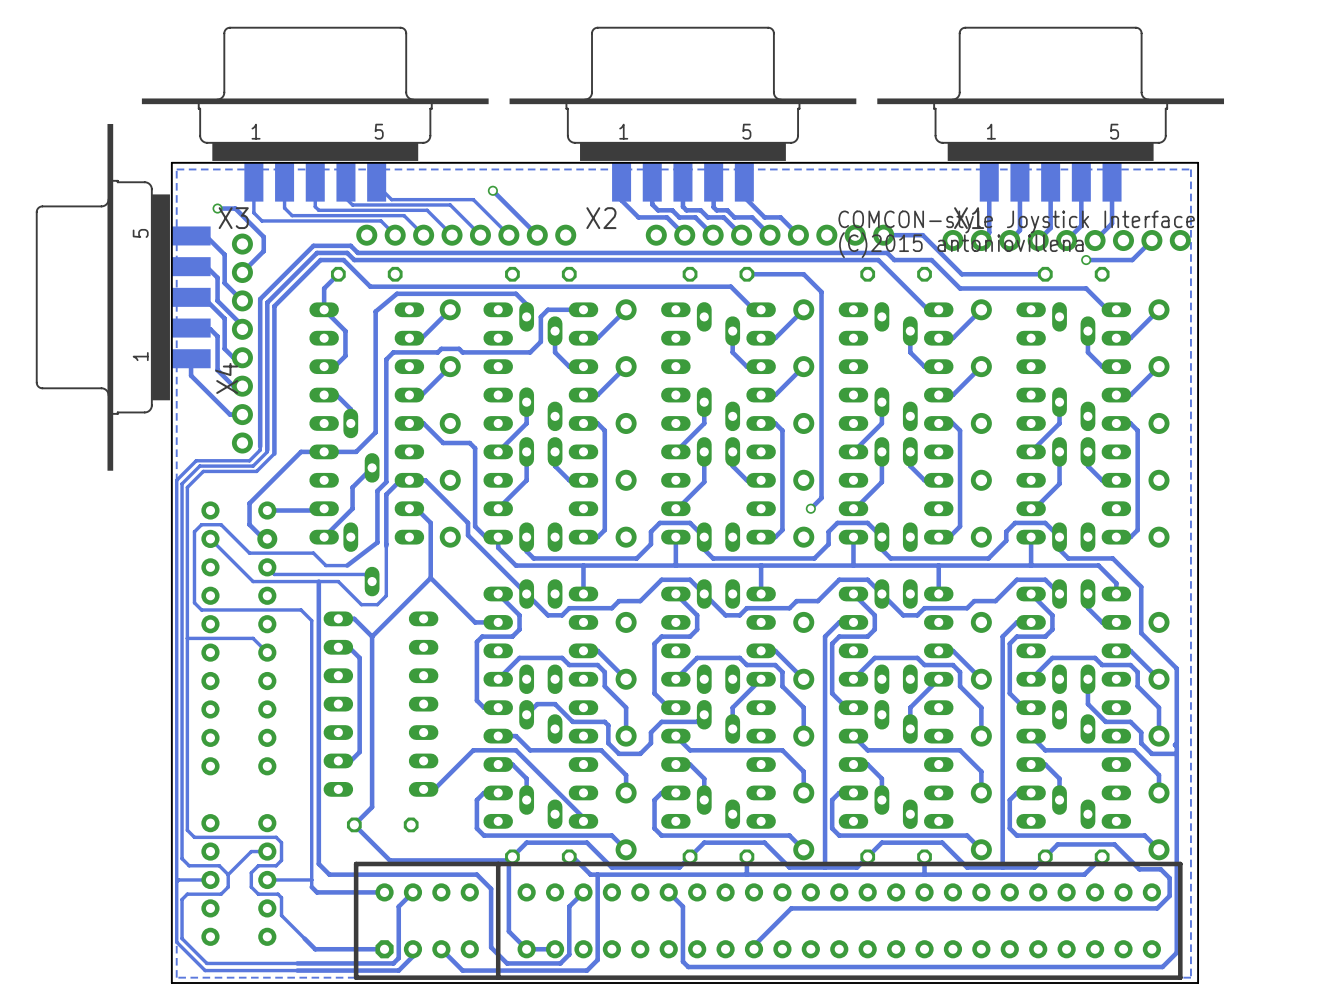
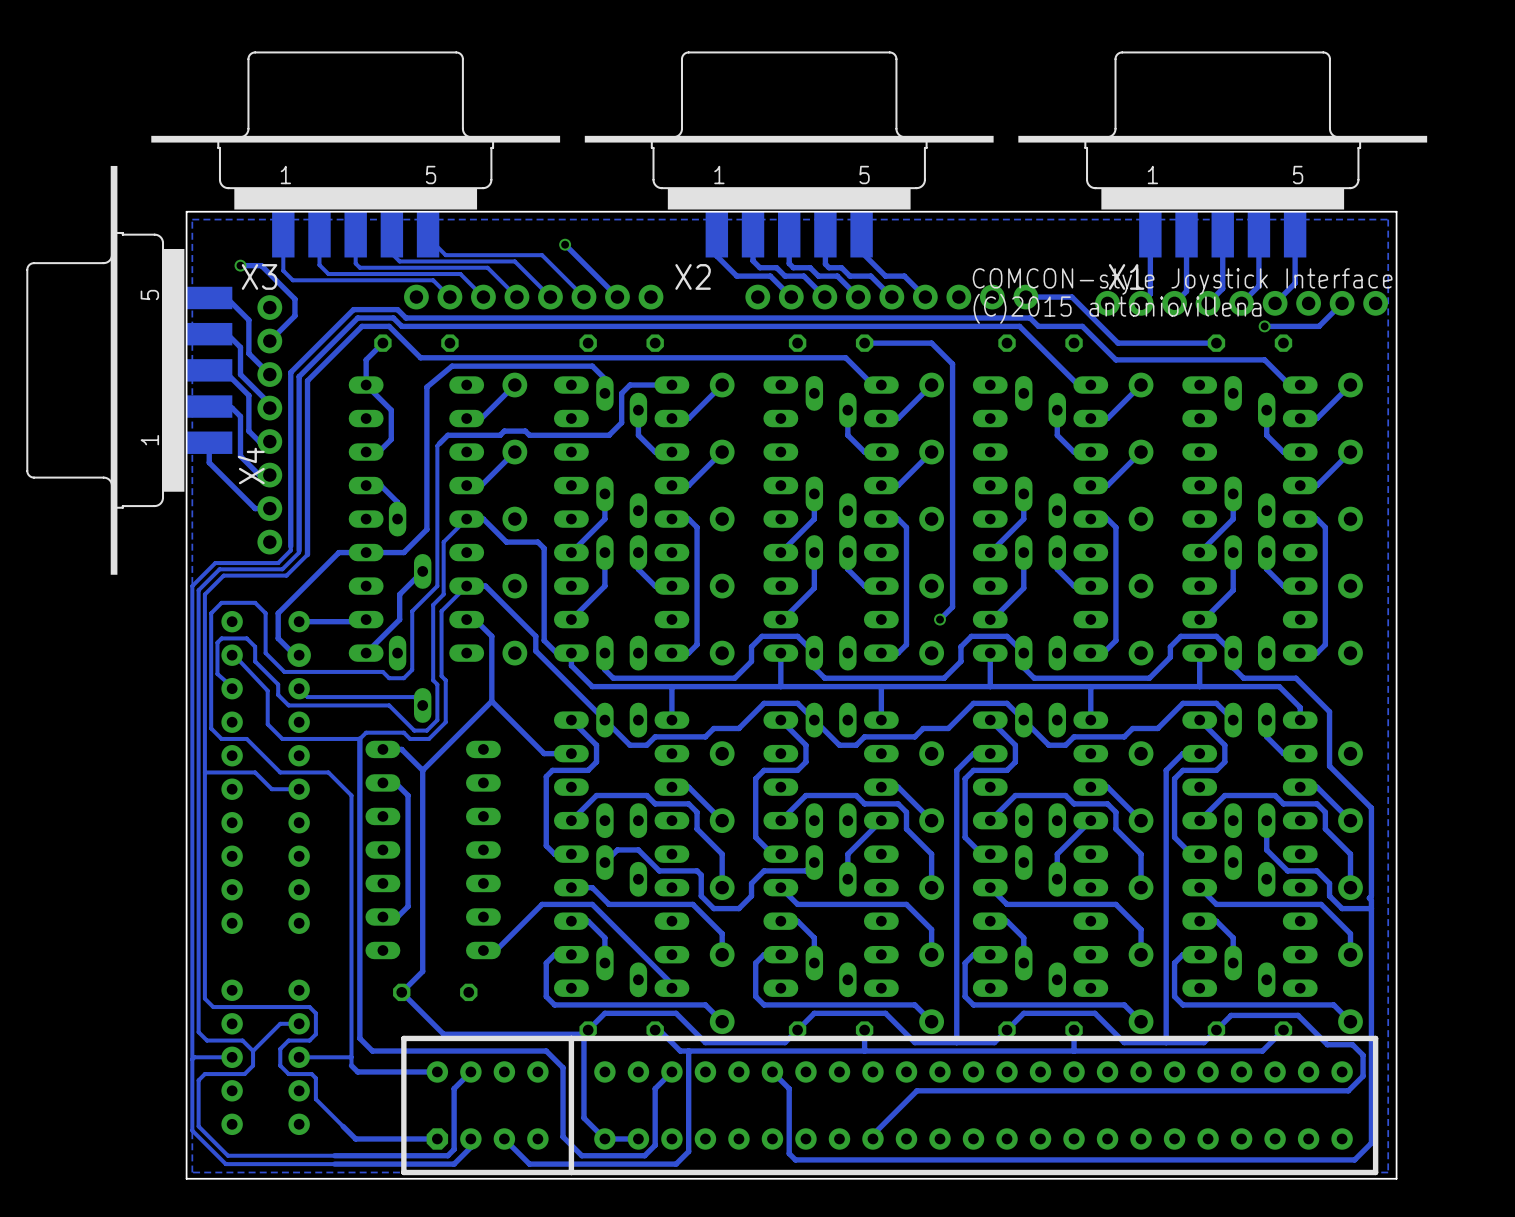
track: (386, 359) (386, 482) (377, 490) (377, 542) (347, 565) (325, 565) (313, 553) -> (439, 443) (437, 445) (437, 586) (412, 611) (412, 669) (403, 678) (389, 678) (382, 671) (353, 671)
track: (409, 480) (400, 480) (386, 494) (386, 546) -> (466, 586) (441, 611) (441, 676) (445, 680) (445, 722) (428, 738) (410, 738) (403, 732) (366, 732) (359, 738) (338, 738)
track: (221, 524) (249, 553) (254, 553) -> (213, 730) (211, 728) (211, 613) (221, 602) (255, 602) (265, 613) (265, 653) (284, 671)
track: (198, 528) (194, 531) (194, 602) -> (217, 642) (217, 674) (234, 688)
track: (210, 538) (253, 581) (258, 581) -> (244, 638) (255, 646) (255, 661) (278, 684) (278, 694) (288, 705)
track: none -> (234, 655) (267, 690) (267, 724) (282, 738)
track: (386, 544) (386, 595) (377, 604) (361, 604) (338, 581) -> (466, 519) (443, 542) (443, 594) (433, 604) (433, 680) (437, 684) (437, 720) (426, 730) (414, 730) (389, 705) (382, 705)
track: (318, 581) (318, 609) -> none
track: (253, 609) (222, 609) -> (280, 772) (246, 738)
track: (301, 609) (311, 620) (311, 657) -> none
track: (251, 638) (230, 638) -> (301, 789) (271, 789) (255, 772)
track: (253, 638) (267, 652) -> (282, 772) (328, 772) (351, 795)

